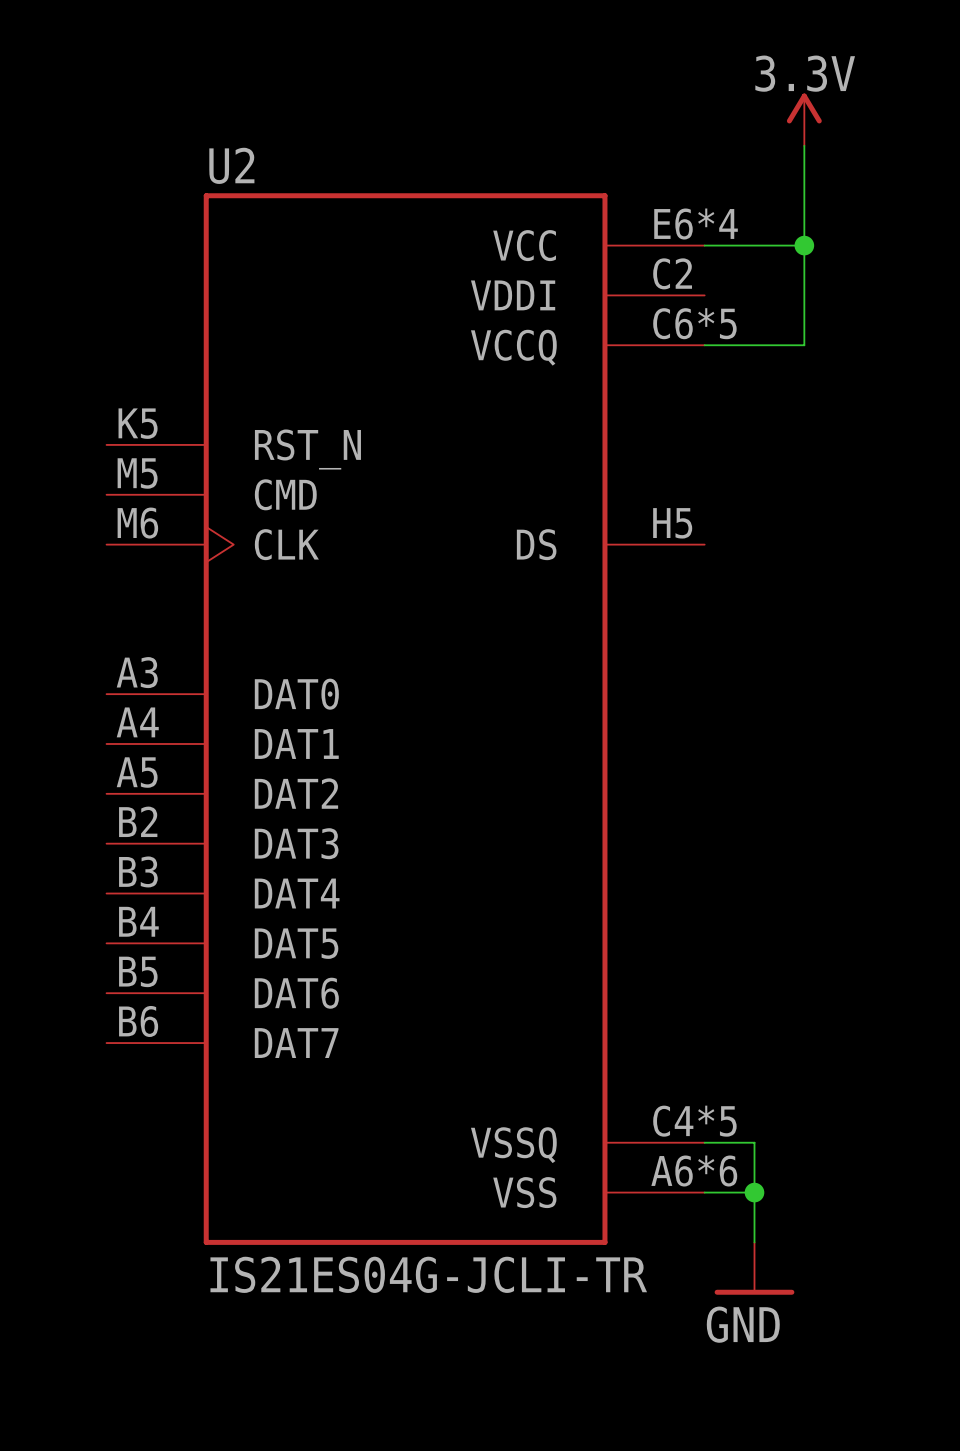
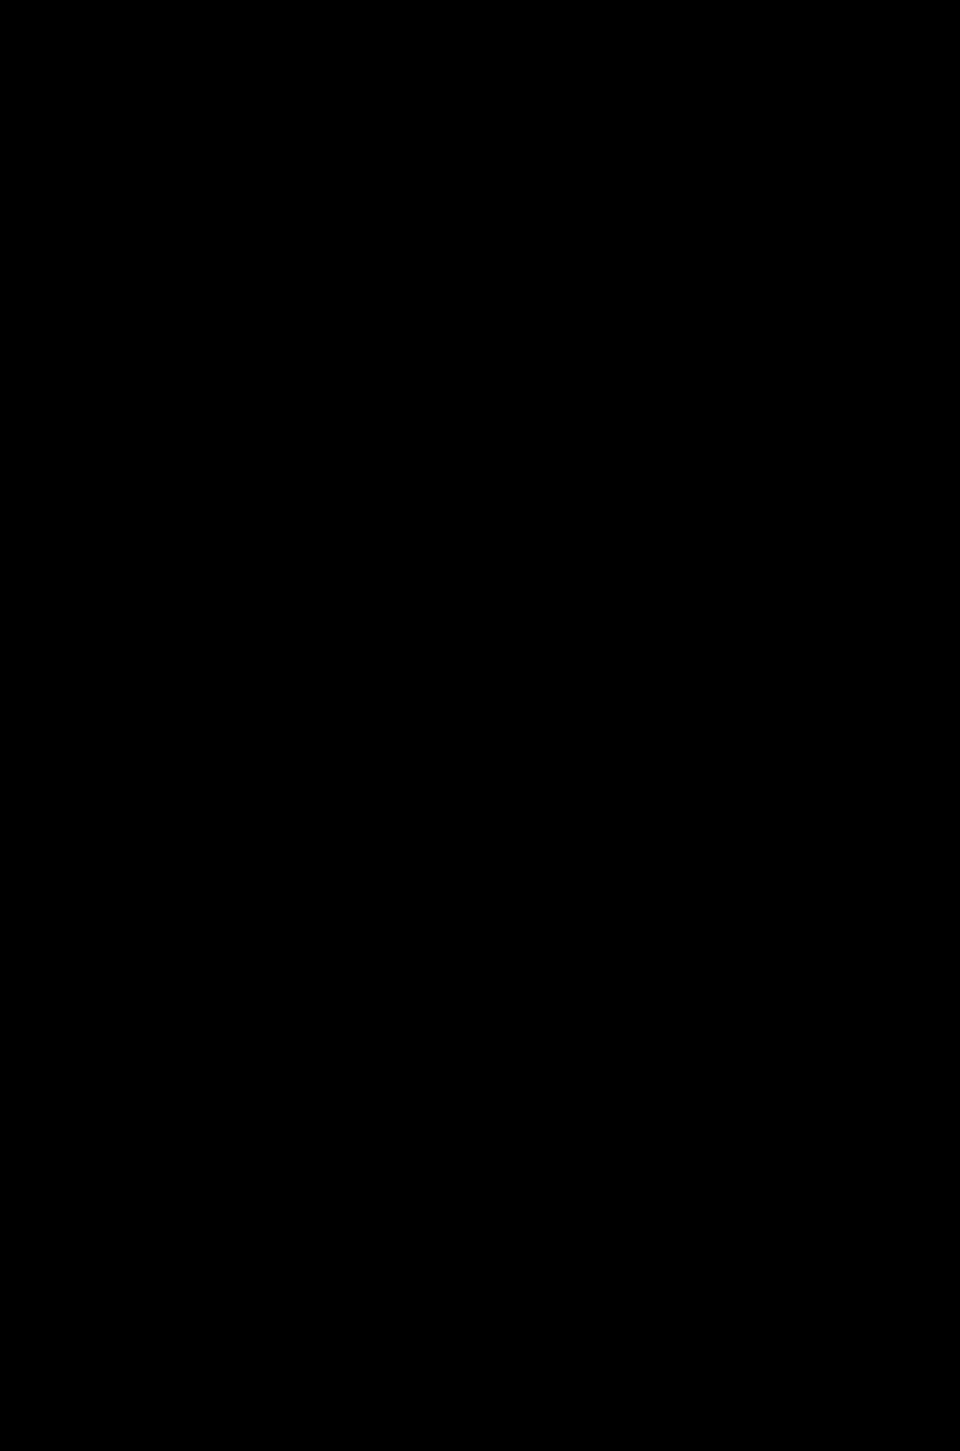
power symbol: 3.3V (804, 119) -> none
wire: (804, 145) (804, 345) (704, 345) -> none
wire: (704, 245) (804, 245) -> none
junction: (804, 245) -> none
U2: IS21ES04G-JCLI-TR (405, 719) -> none
wire: (704, 1142) (754, 1142) (754, 1242) -> none
wire: (704, 1192) (754, 1192) -> none
junction: (754, 1192) -> none
power symbol: GND (754, 1268) -> none

